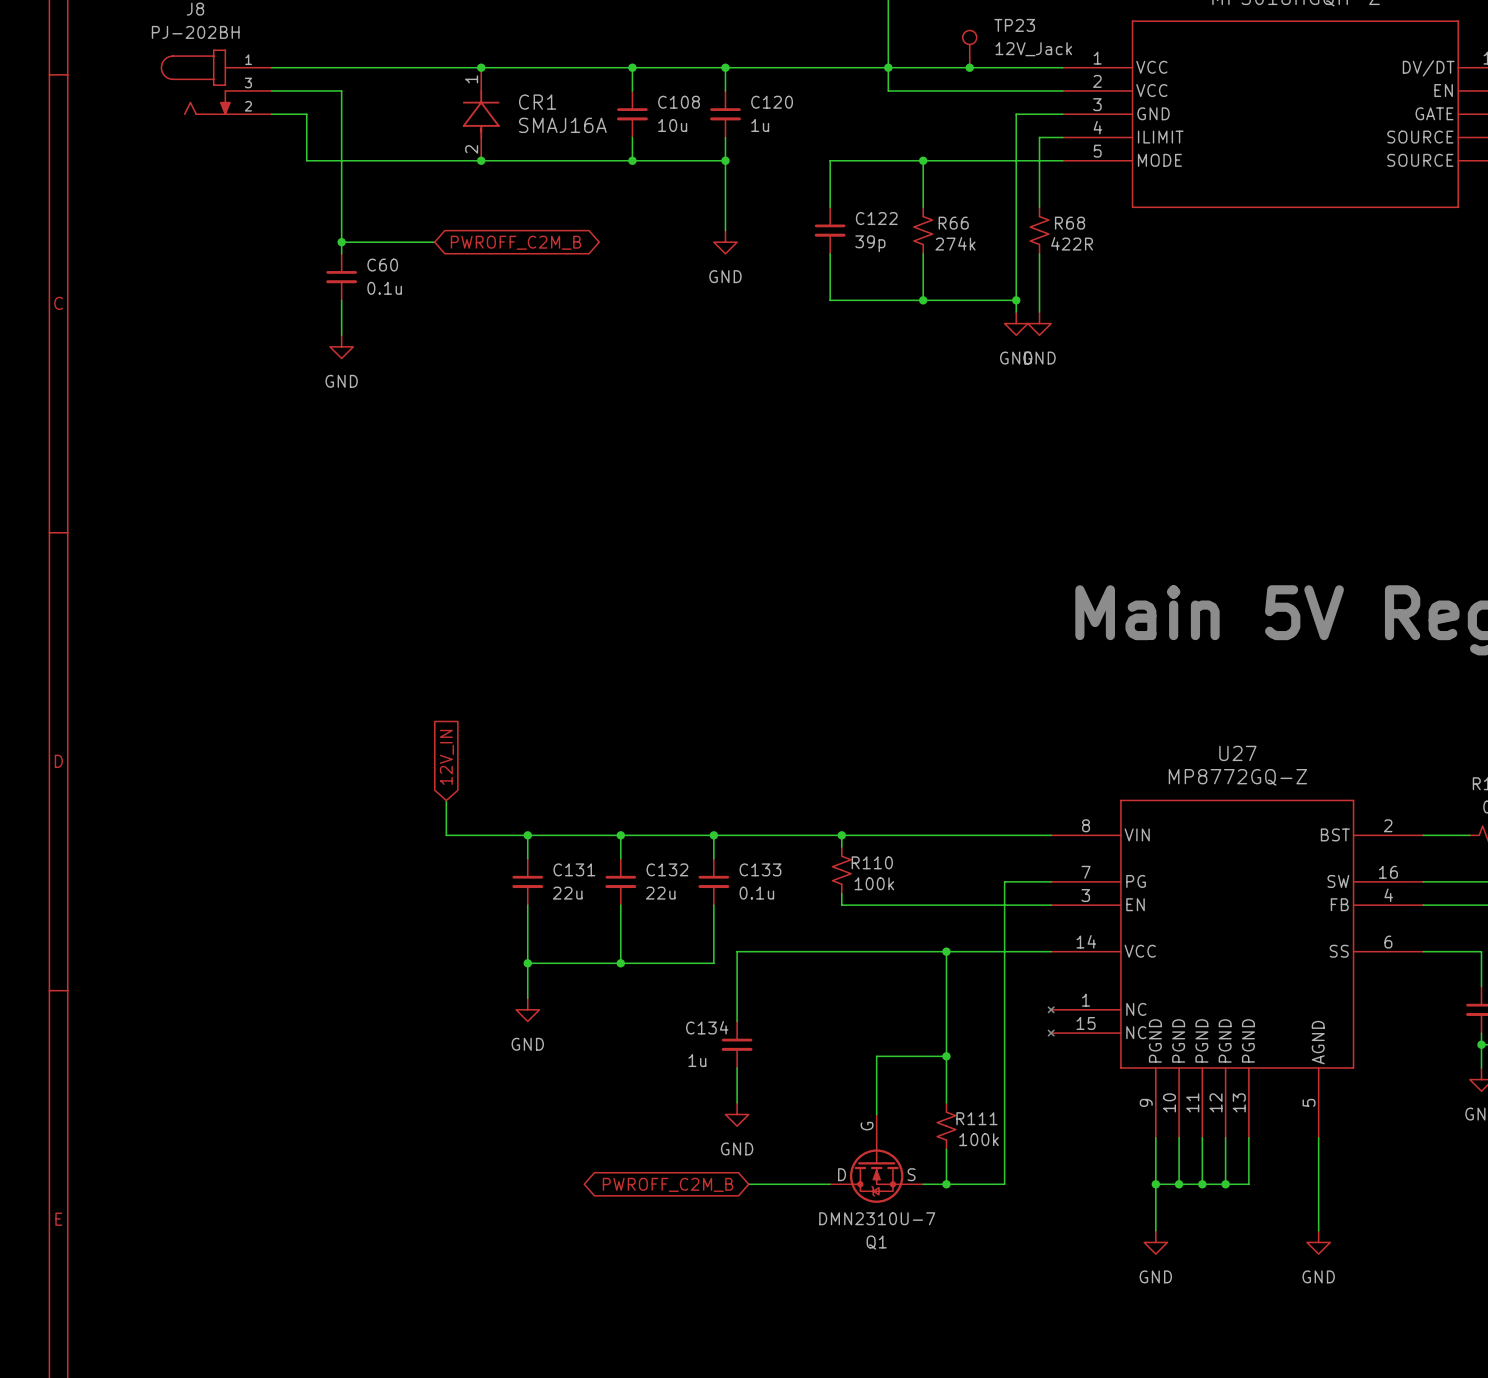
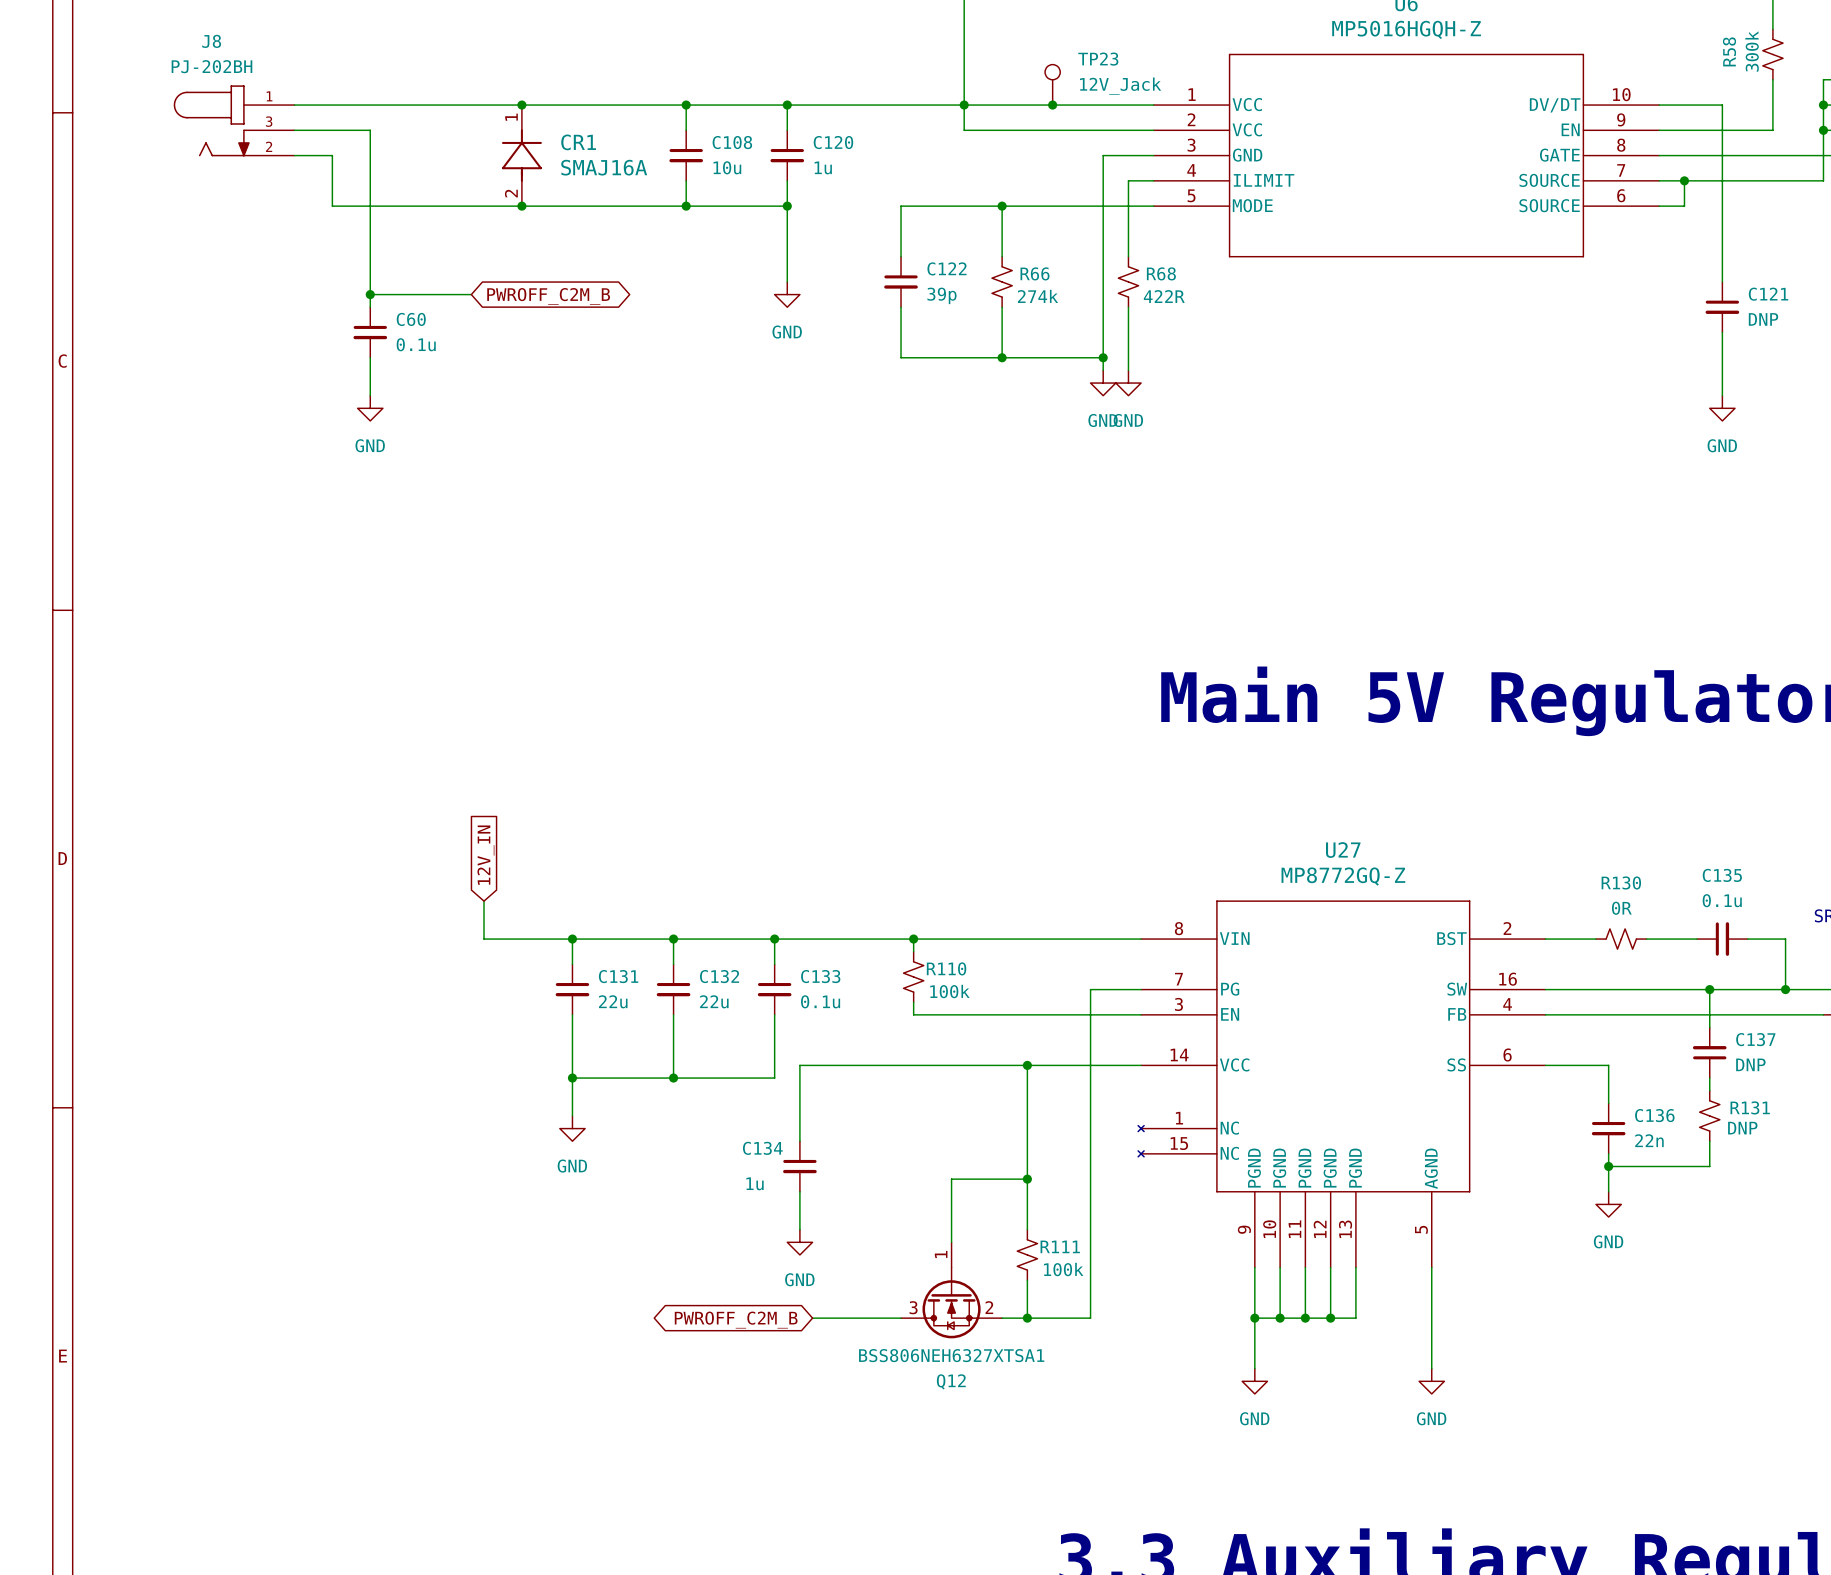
Q1: DMN2310U-7 (876, 1158) -> none
Q12: none -> BSS806NEH6327XTSA1 (951, 1290)

